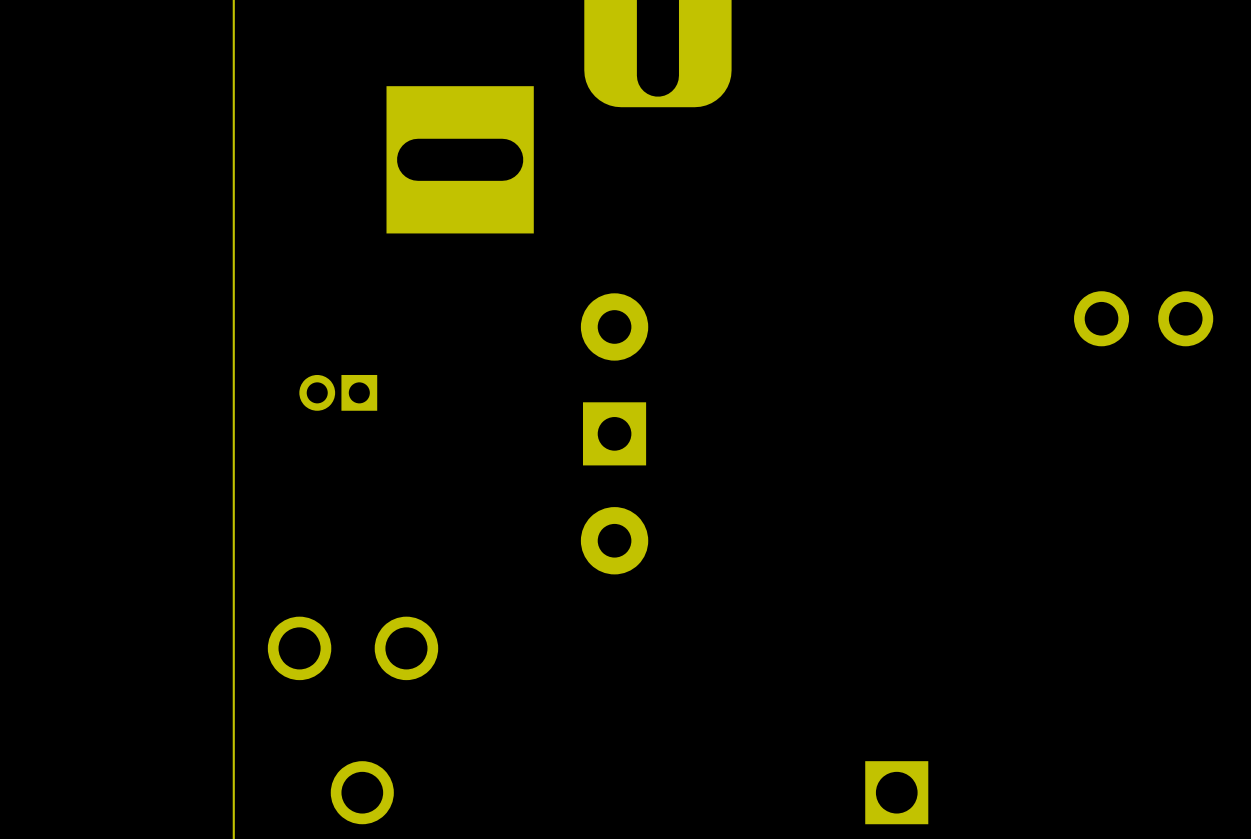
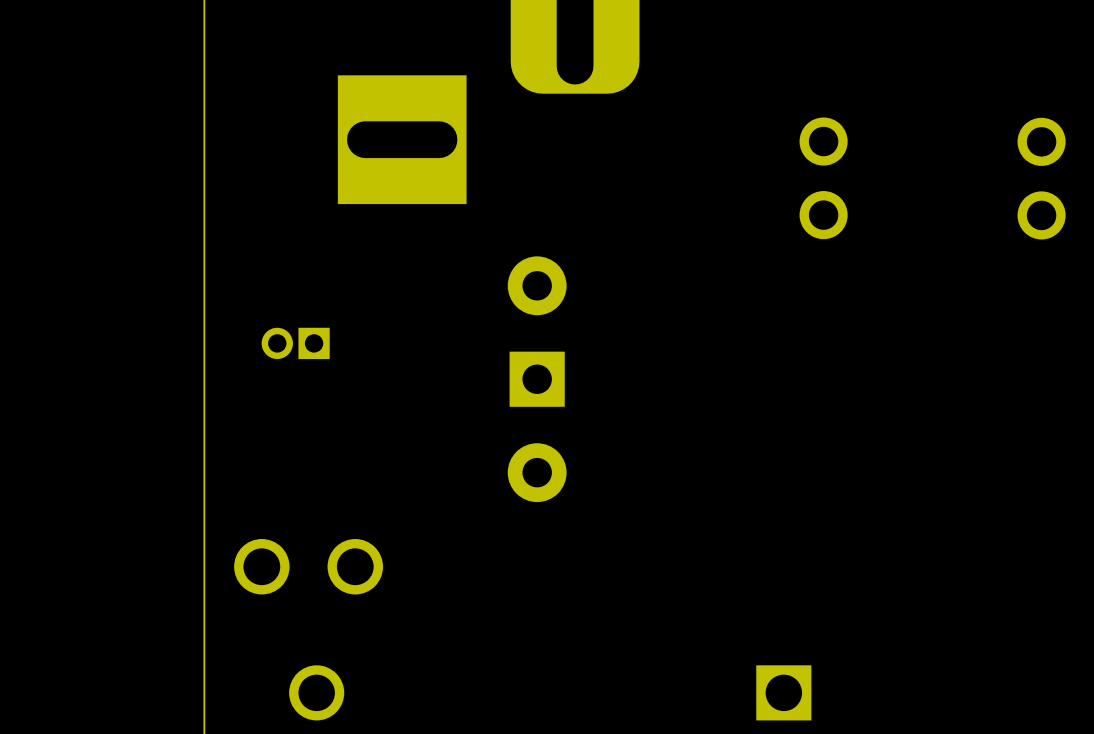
part: none -> (823, 178)
part: none -> (1041, 178)
part: (1143, 318) -> none

